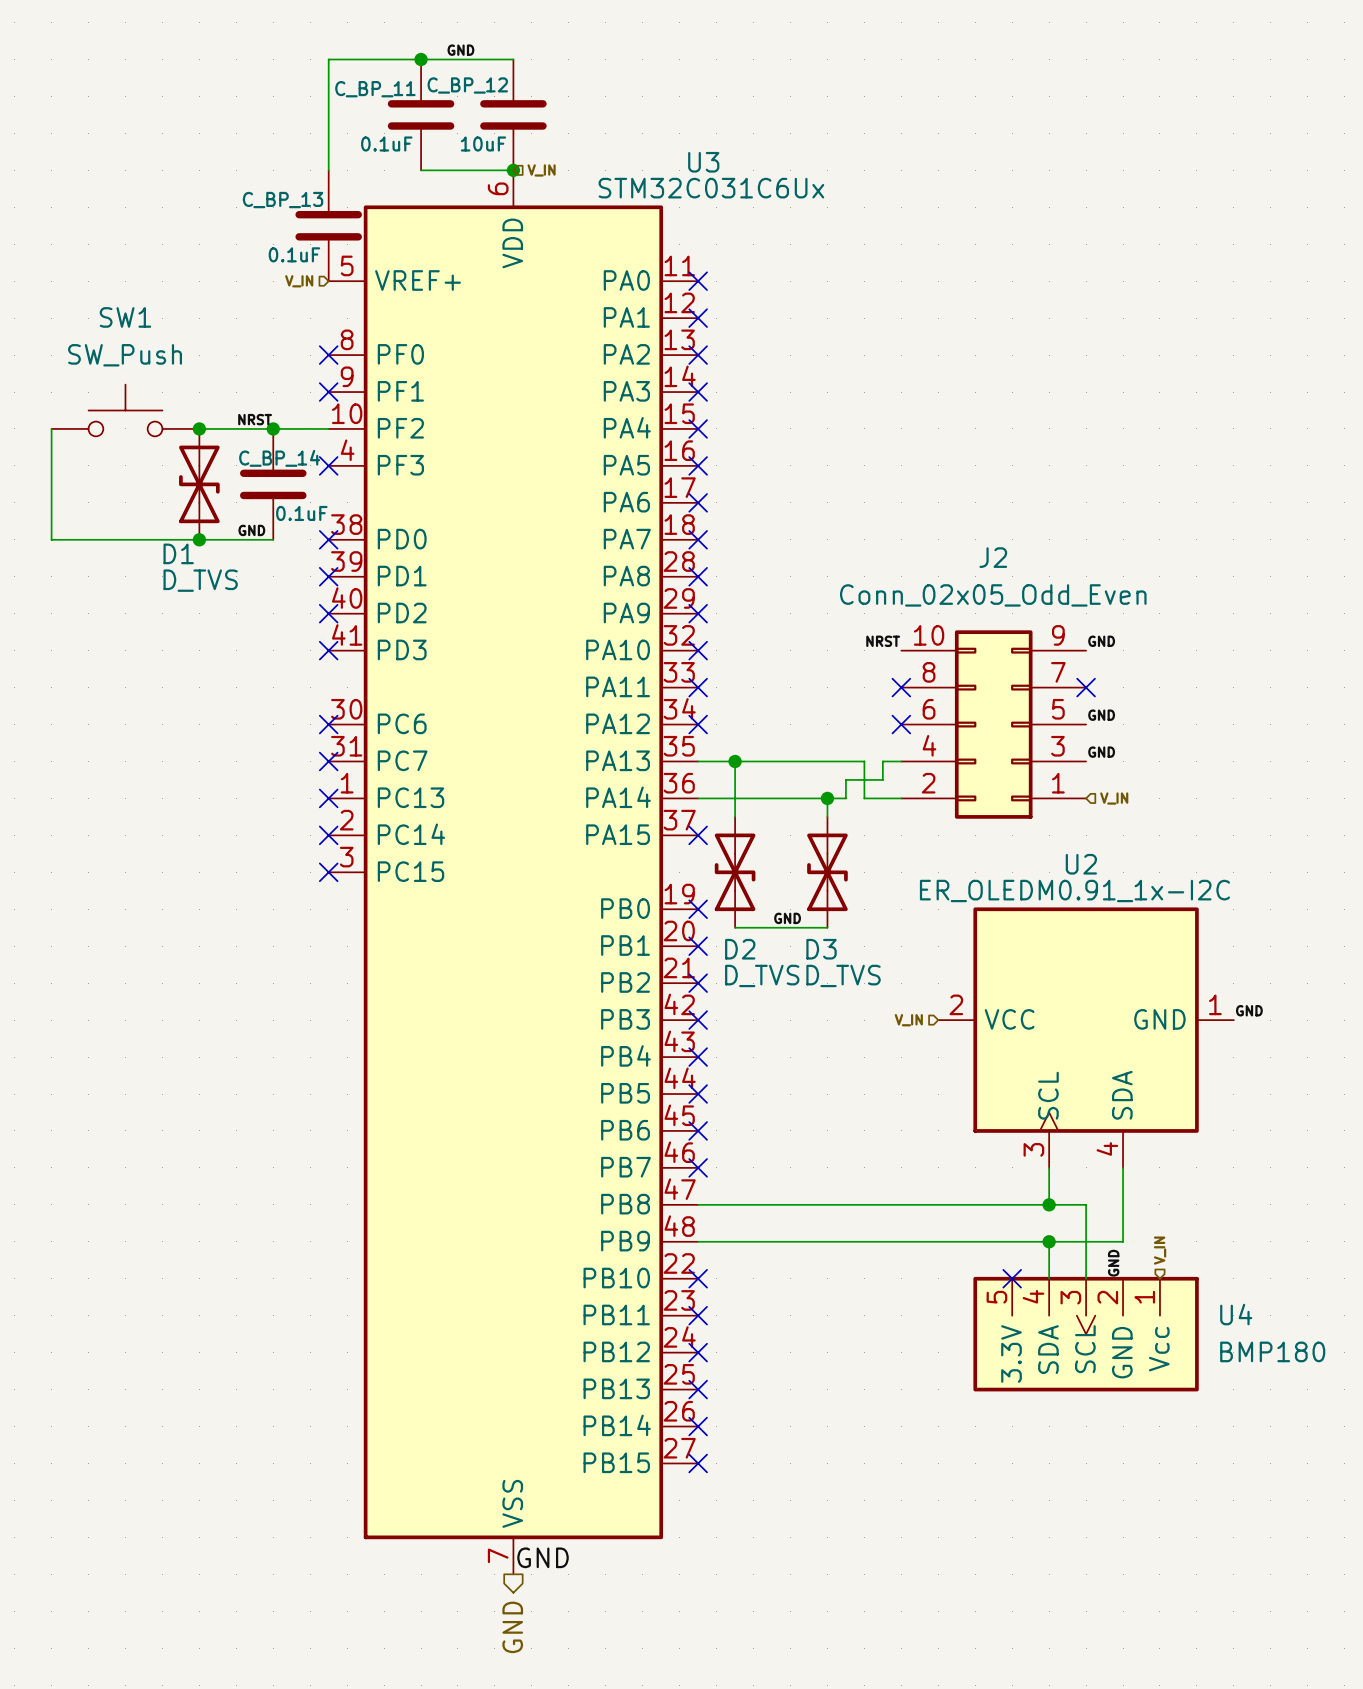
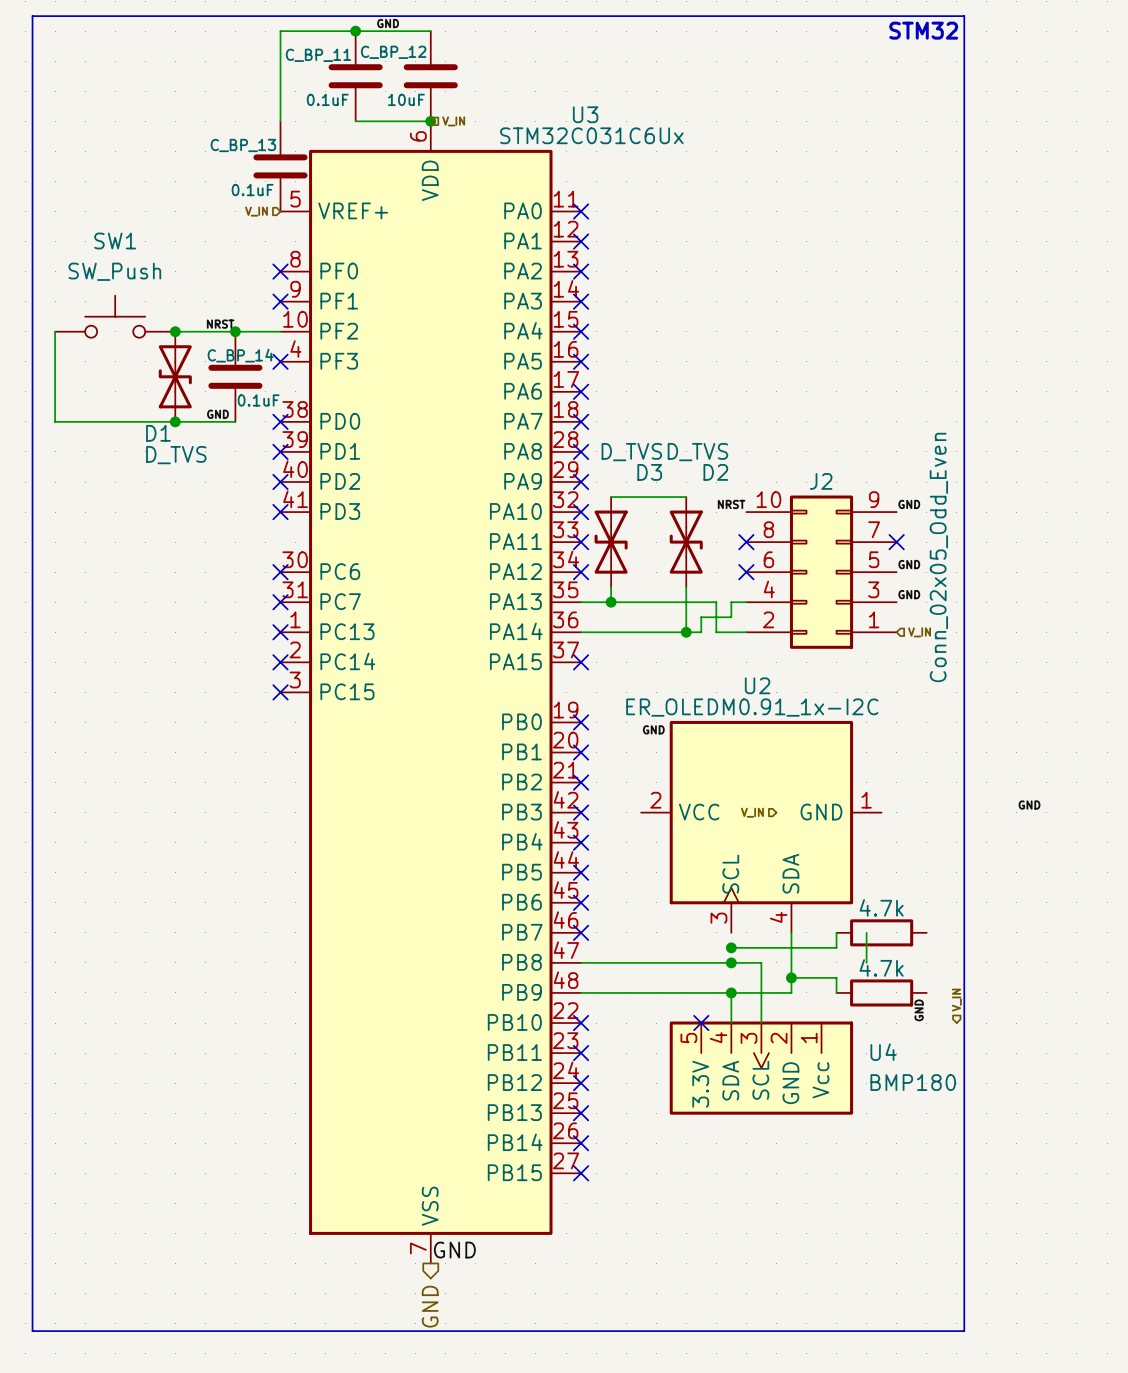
line: none -> (32, 16) (964, 16) (964, 1331) (32, 1331) (32, 16)
text: none -> STM32 (923, 30)
J2 name position: J2 (993, 557) -> J2 (821, 481)
J2 value rotation: 0° (993, 595) -> 90° counterclockwise (938, 557)
wire: (735, 761) (735, 816) -> (611, 602) (611, 587)
wire: (827, 798) (827, 816) -> (686, 632) (686, 587)
D2 position: (735, 872) -> (686, 542)
D3 position: (827, 872) -> (611, 542)
wire: (735, 927) (827, 927) -> (611, 497) (686, 497)
D2 name position: D2 (740, 949) -> D2 (715, 472)
D3 name position: D3 (821, 949) -> D3 (649, 472)
D2 value position: D_TVS (762, 975) -> D_TVS (697, 452)
D3 value position: D_TVS (843, 975) -> D_TVS (631, 452)
U2 position: (1086, 1037) -> (761, 826)
wire: none -> (836, 932) (836, 947) (731, 947)
part: none -> 4.7k (881, 932)
wire: (1123, 1167) (1123, 1241) (956, 1241) -> (791, 932) (791, 992)
junction: none -> (731, 947)
junction: none -> (731, 962)
wire: (919, 1204) (1086, 1204) (1086, 1278) -> (761, 962) (761, 1023)
junction: (1049, 1204) -> none
wire: none -> (791, 977) (836, 977) (836, 992)
junction: none -> (791, 977)
junction: none -> (731, 992)
wire: (1049, 1241) (1049, 1278) -> (731, 992) (731, 1023)
junction: (1049, 1241) -> none
part: none -> 4.7k (881, 992)
no-connect mark: none -> (701, 1023)
no-connect mark: (1012, 1278) -> none
U4 position: (1086, 1334) -> (761, 1068)

